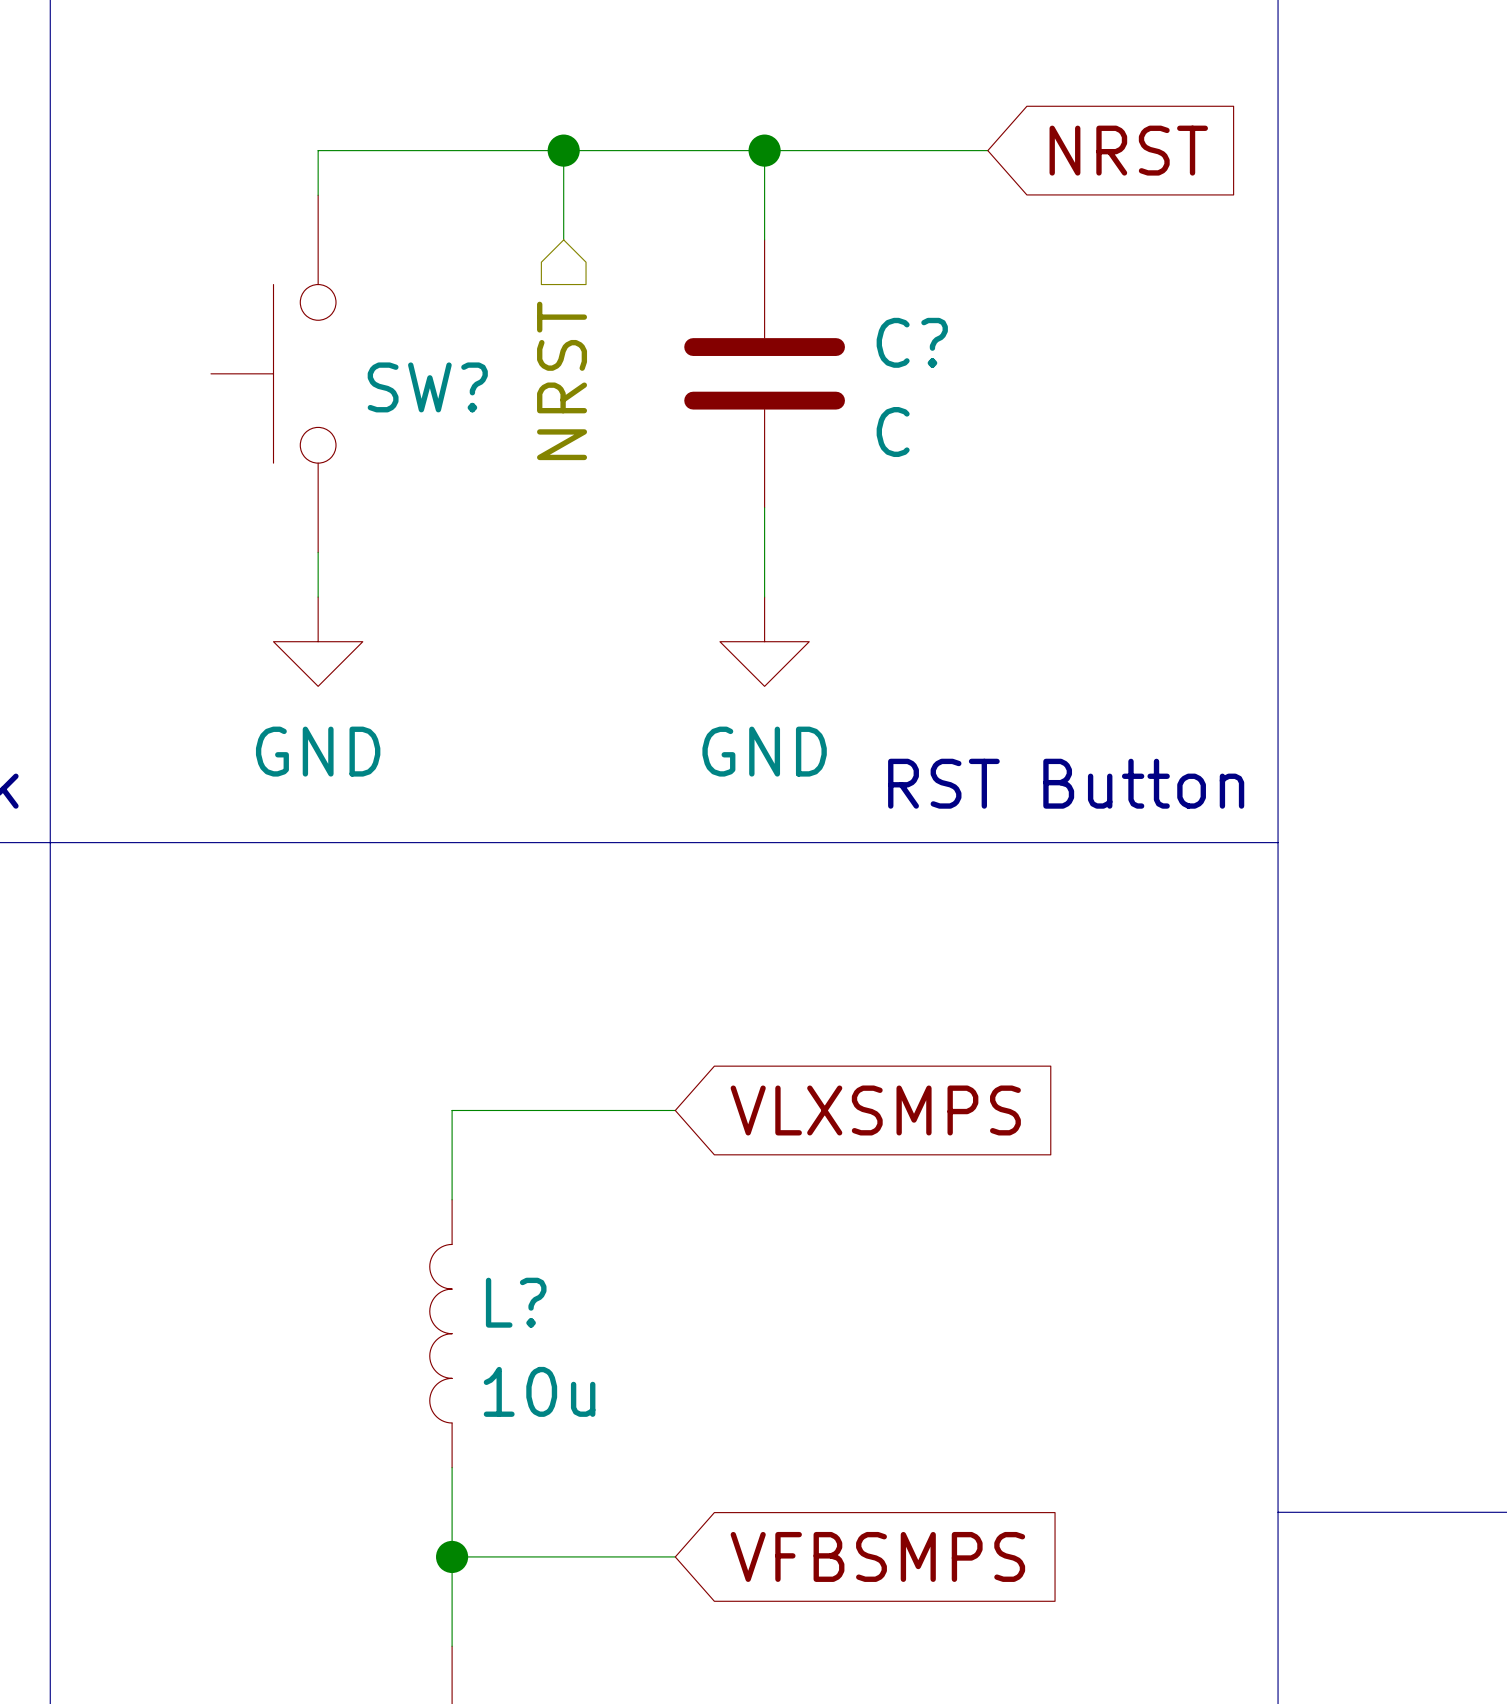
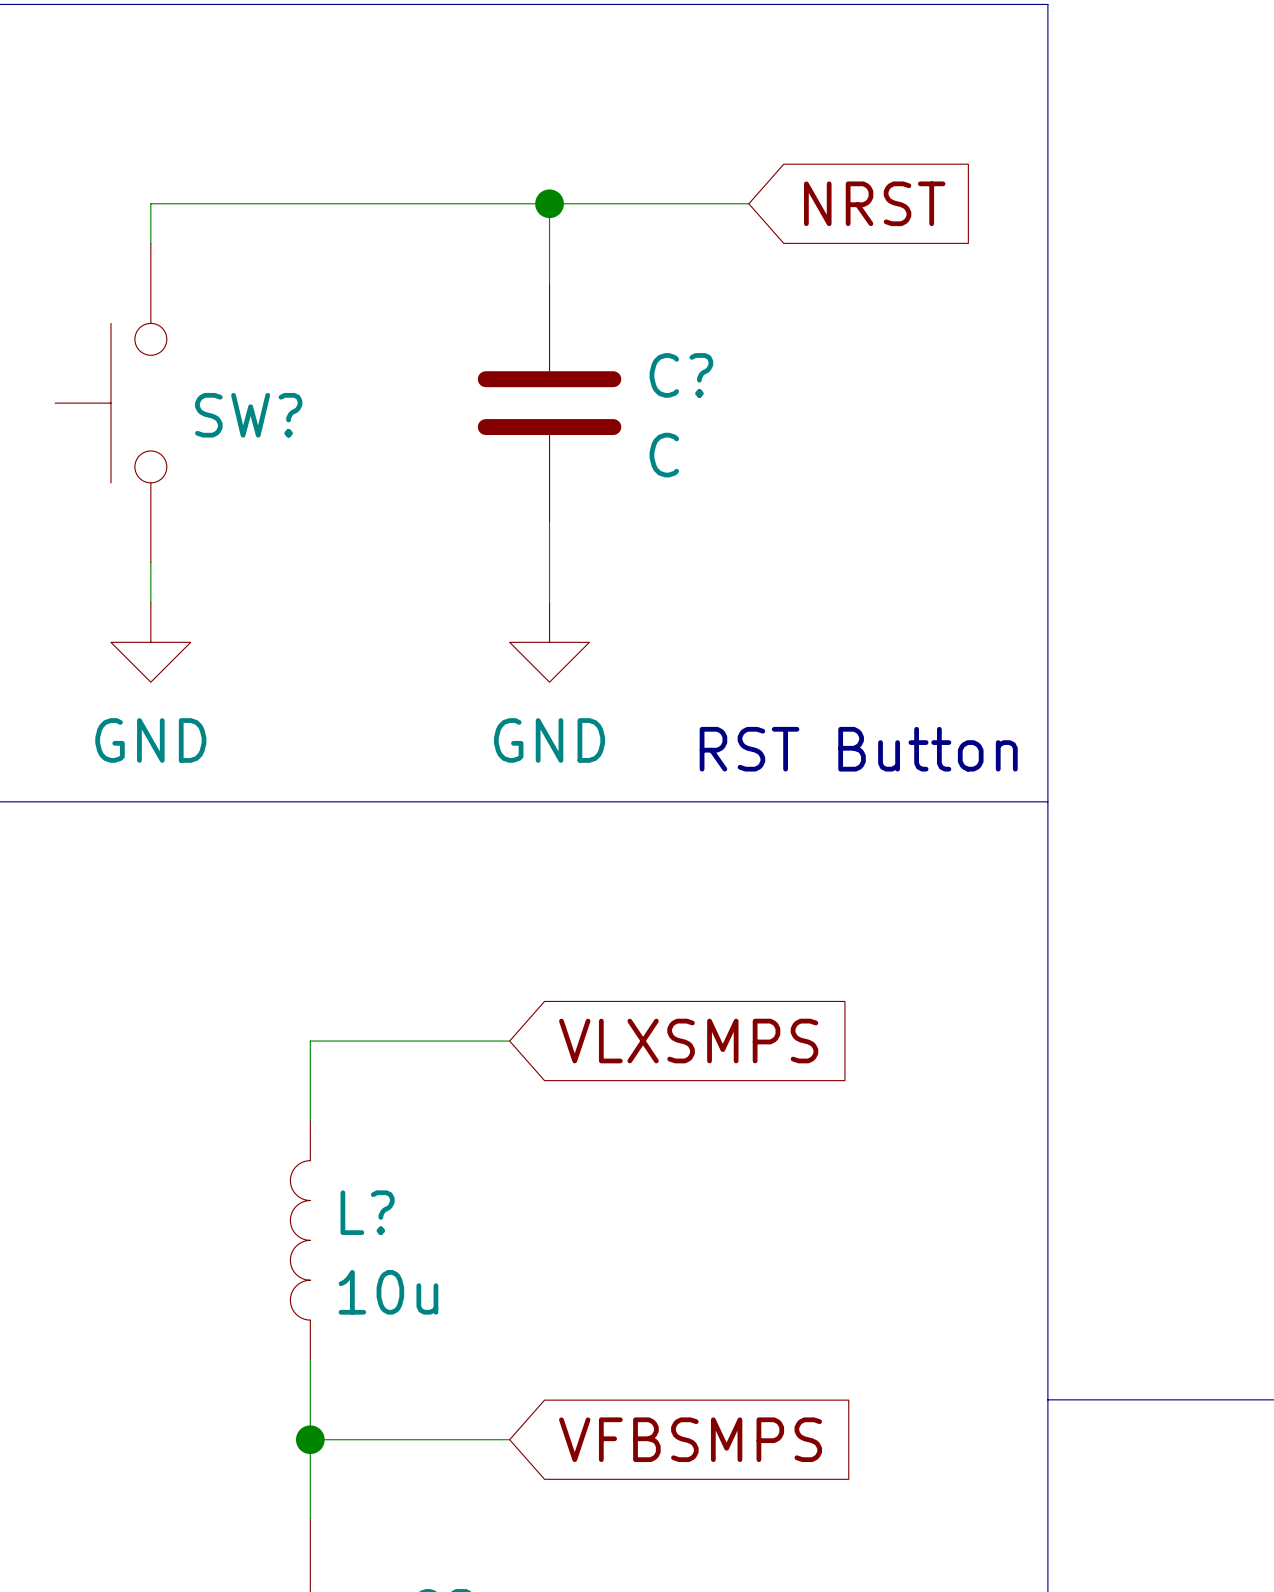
wire: (563, 150) (563, 239) -> none
junction: (563, 150) -> none
wire: (764, 150) (764, 239) -> (549, 203) (549, 283)
junction position: (764, 150) -> (549, 203)
wire: (987, 150) (318, 150) (318, 195) -> (748, 203) (150, 203) (150, 243)
global label position: NRST (1128, 150) -> NRST (874, 203)
SW? position: (273, 373) -> (110, 403)
C? position: (764, 373) -> (549, 403)
hierarchical label: NRST (562, 380) -> none
wire: (764, 507) (764, 597) -> (549, 522) (549, 602)
wire: (318, 552) (318, 597) -> (150, 562) (150, 602)
power symbol position: GND (318, 641) -> GND (150, 642)
power symbol position: GND (764, 641) -> GND (549, 642)

